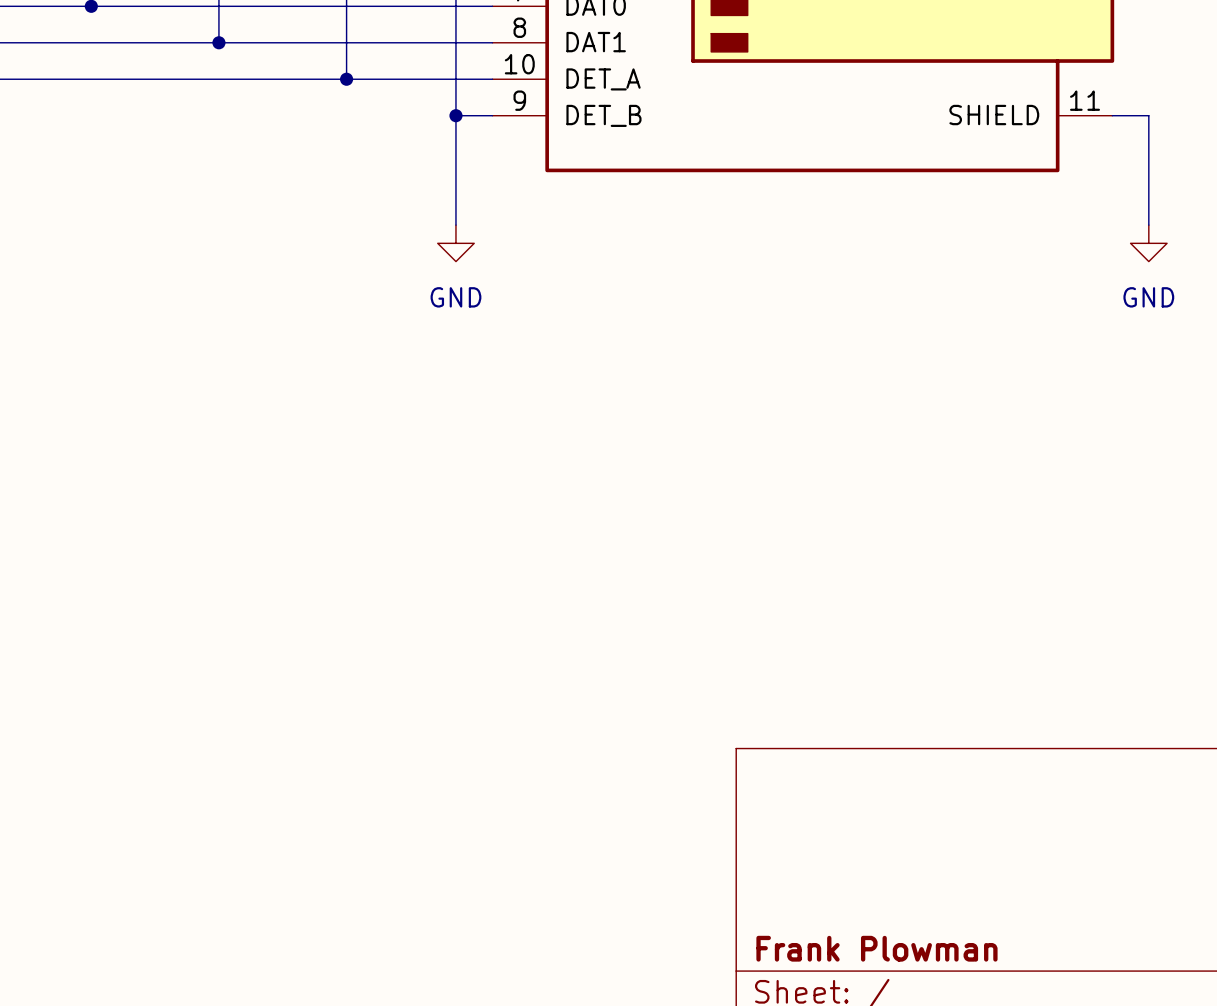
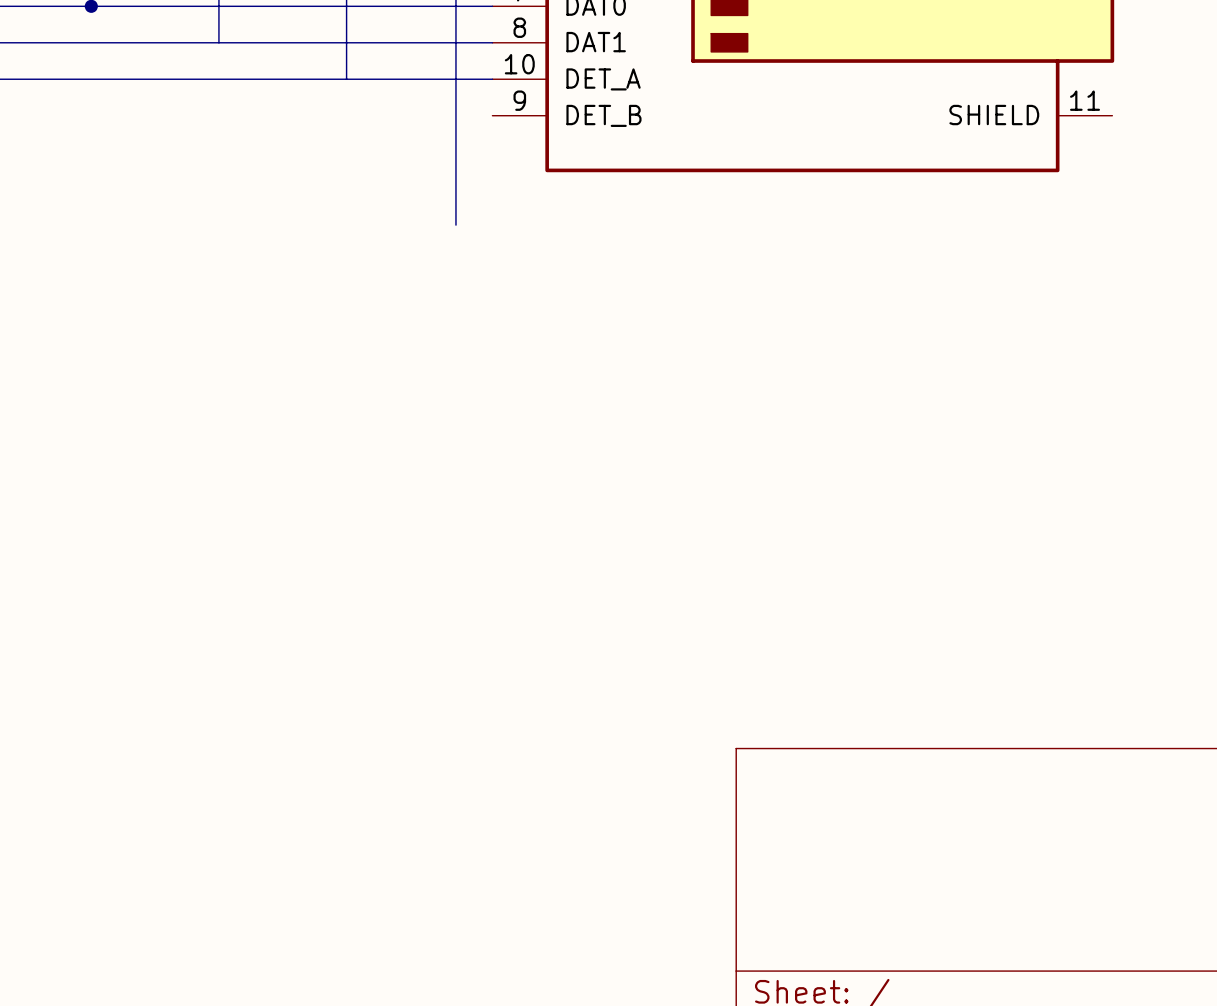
junction: (218, 42) -> none
junction: (346, 79) -> none
wire: (455, 115) (492, 115) -> none
junction: (455, 115) -> none
wire: (1112, 115) (1148, 115) (1148, 225) -> none
power symbol: GND (455, 243) -> none
power symbol: GND (1148, 243) -> none
title block: Frank Plowman (876, 948) -> none

